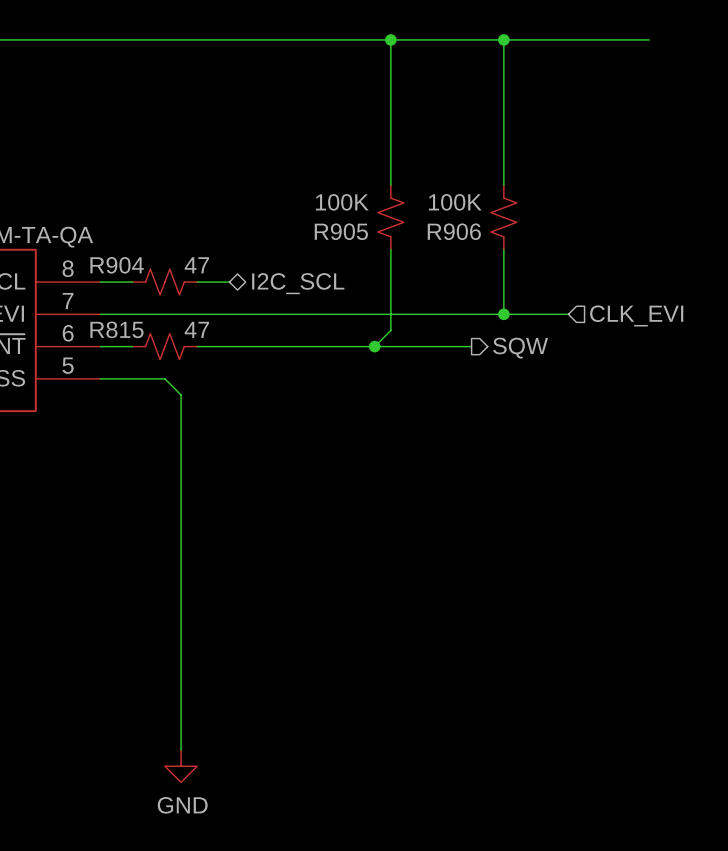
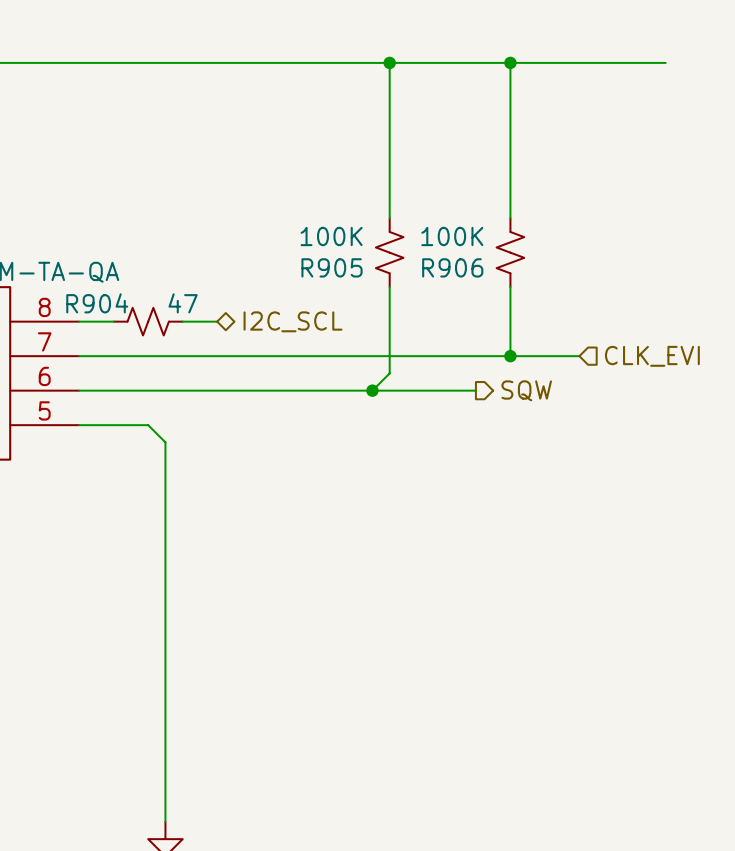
R815: 47 (164, 346) -> none

